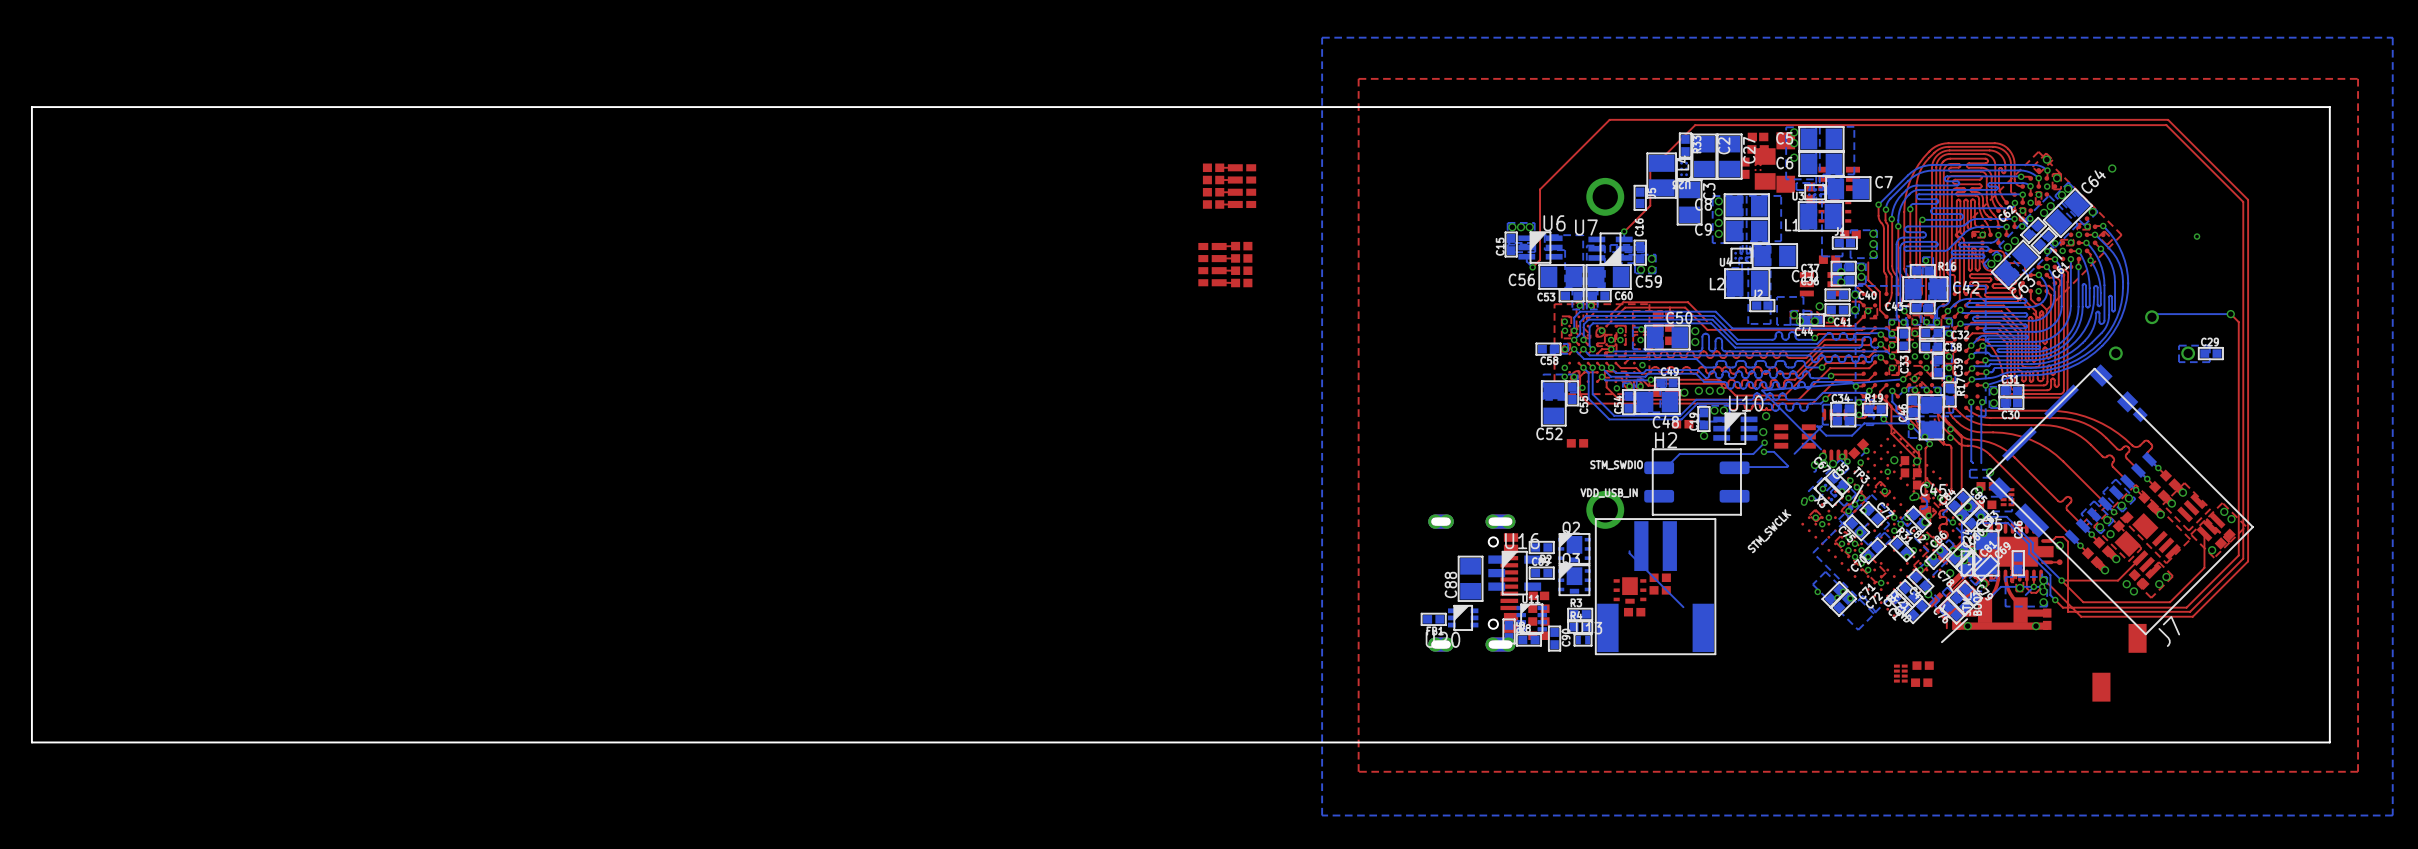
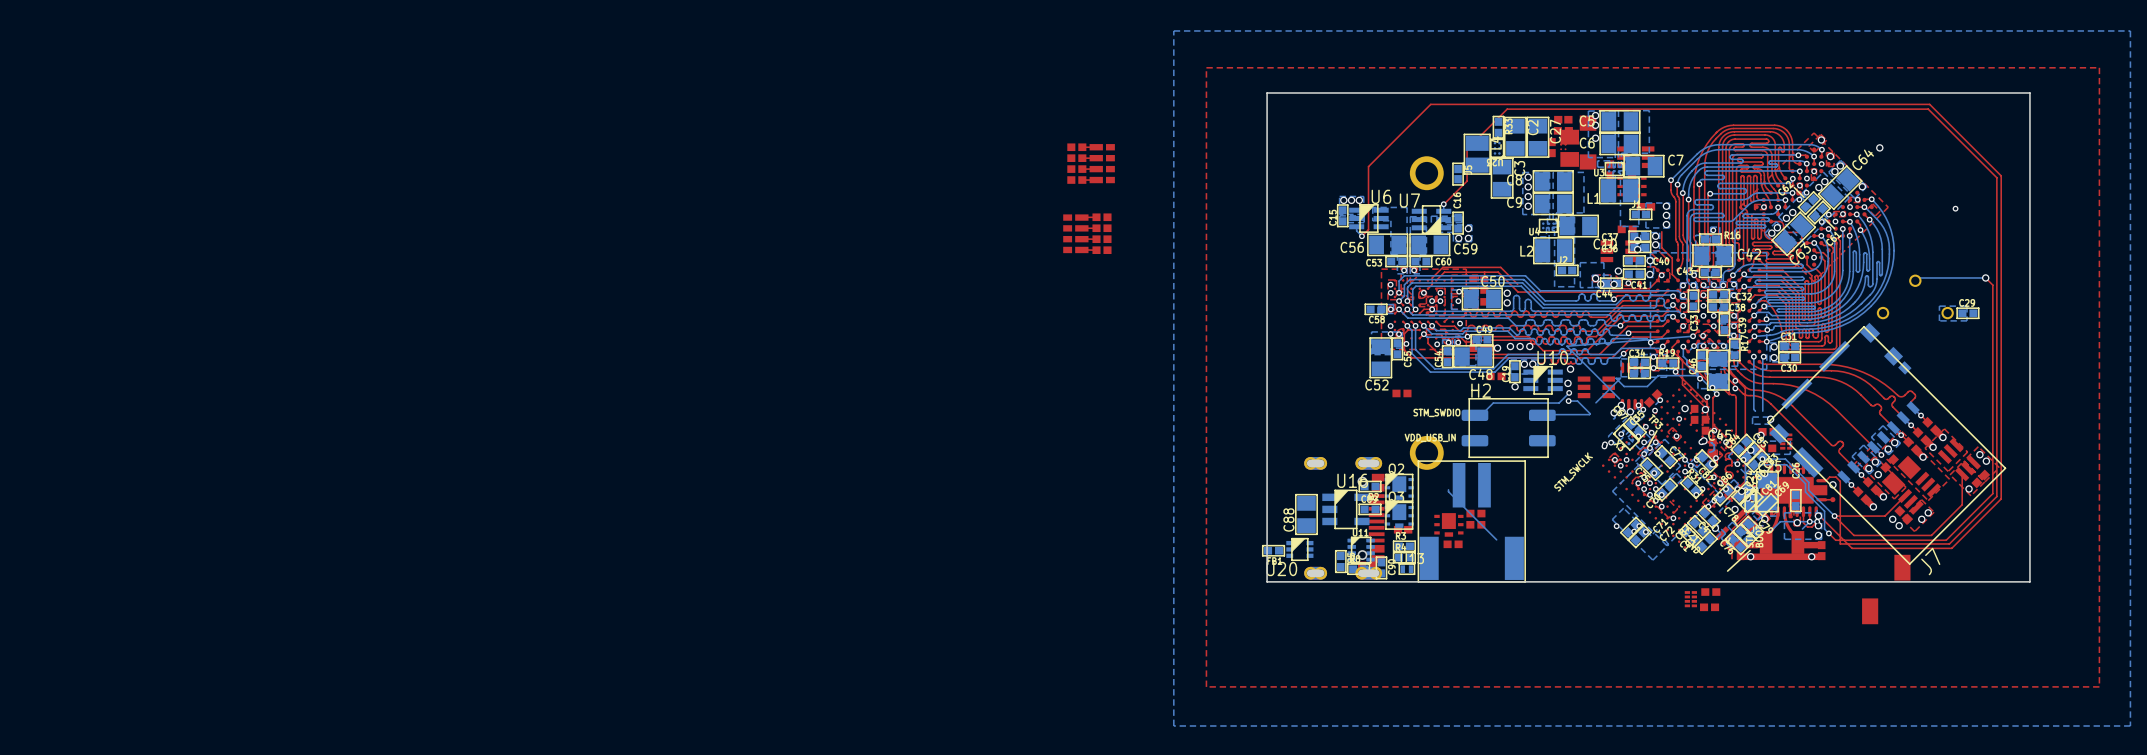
board edge: (2280, 107) (2329, 107) (2329, 742) (31, 742) (31, 107) (1426, 107) -> (2029, 92) (2029, 581) (1267, 581) (1267, 92)
part position: (1473, 583) -> (1344, 518)
part position: (1538, 595) -> (1403, 529)
part: (1538, 608) -> none
part: (1538, 621) -> none

